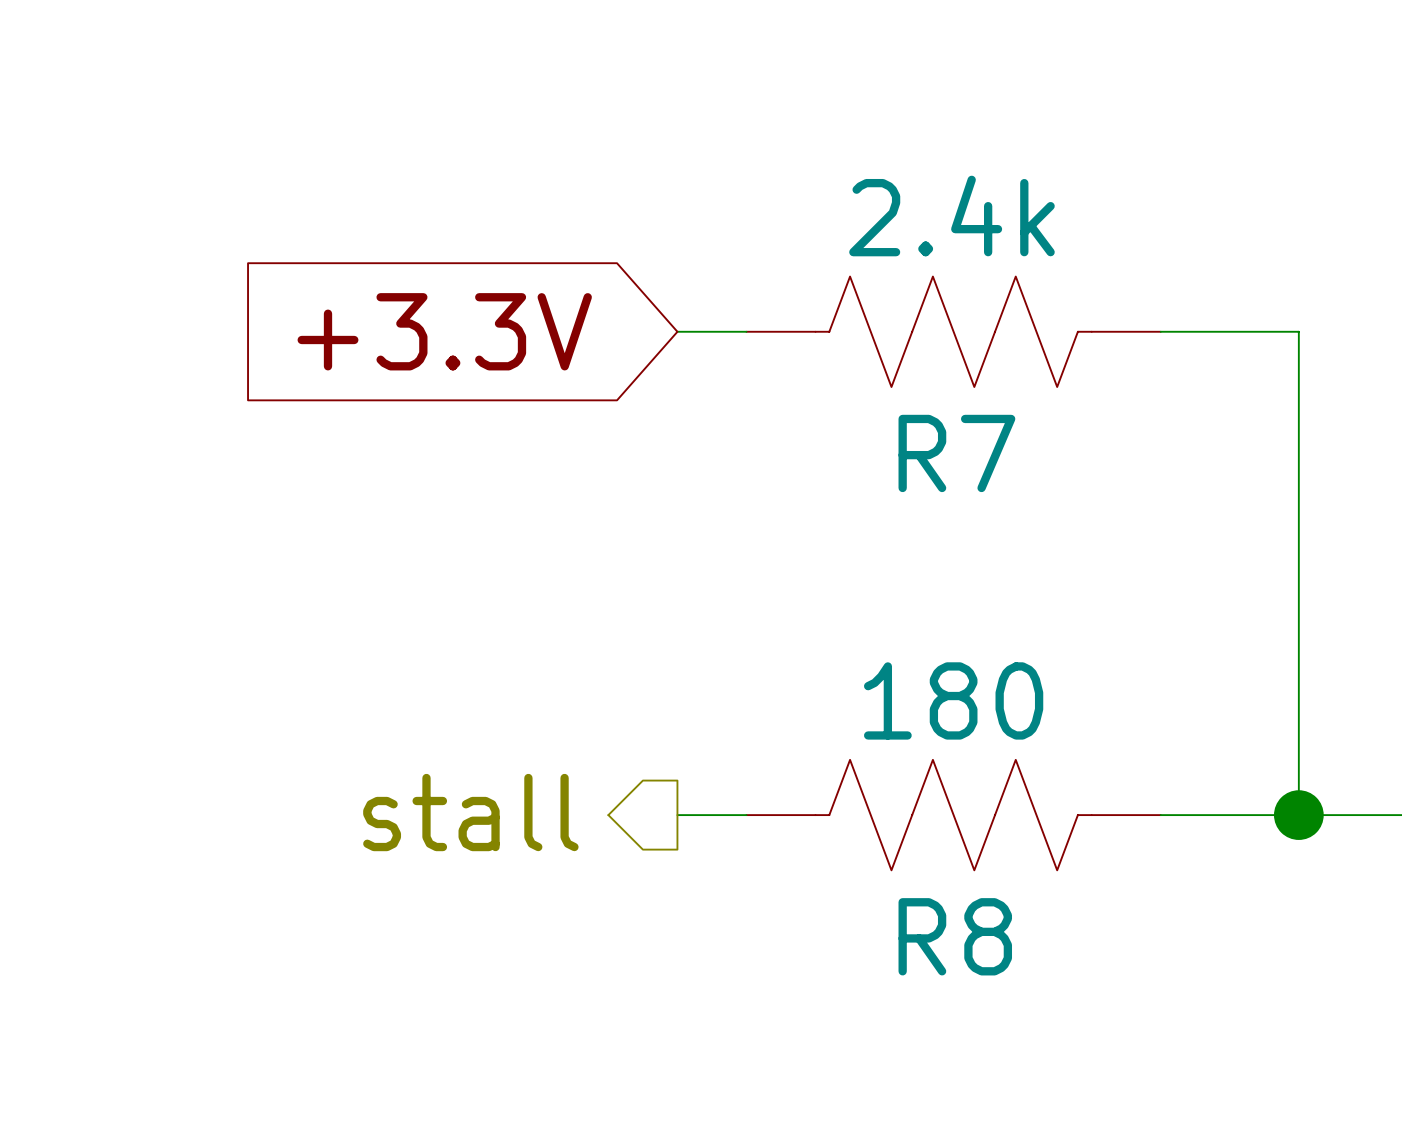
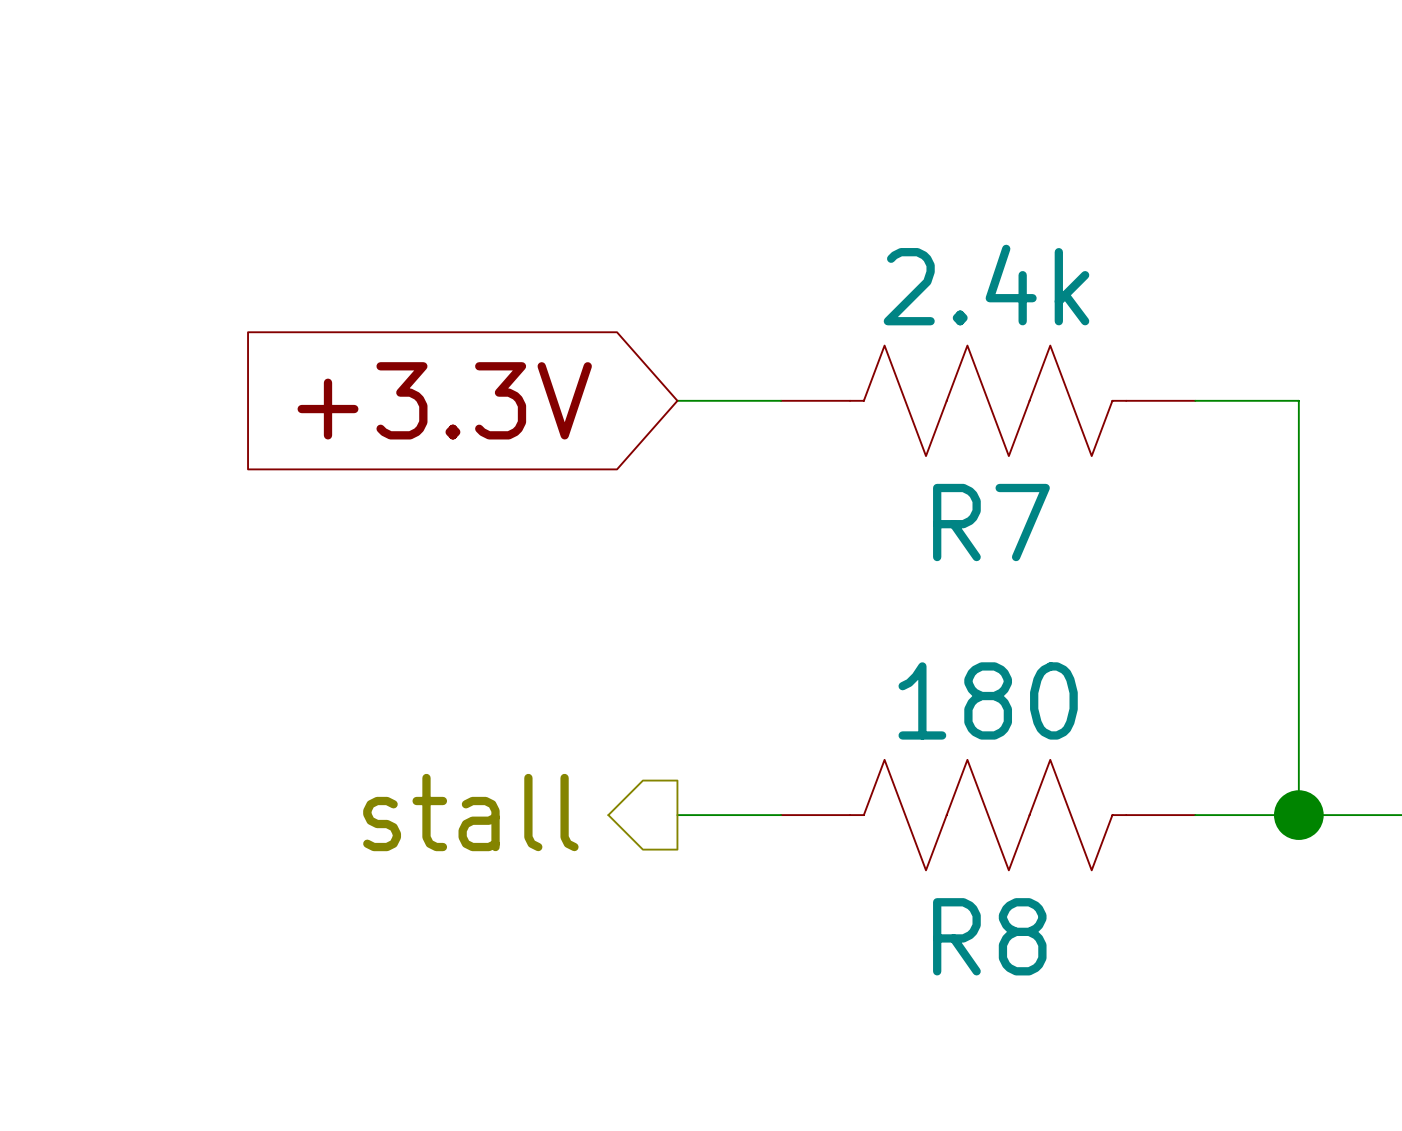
global label position: +3.3V (444, 331) -> +3.3V (444, 400)
wire: (677, 331) (746, 331) -> none
R7 position: (953, 331) -> (988, 400)
wire: (1160, 331) (1298, 331) (1298, 400) -> (1195, 400) (1298, 400)
wire: none -> (677, 400) (781, 400)
R8 position: (953, 815) -> (988, 815)

